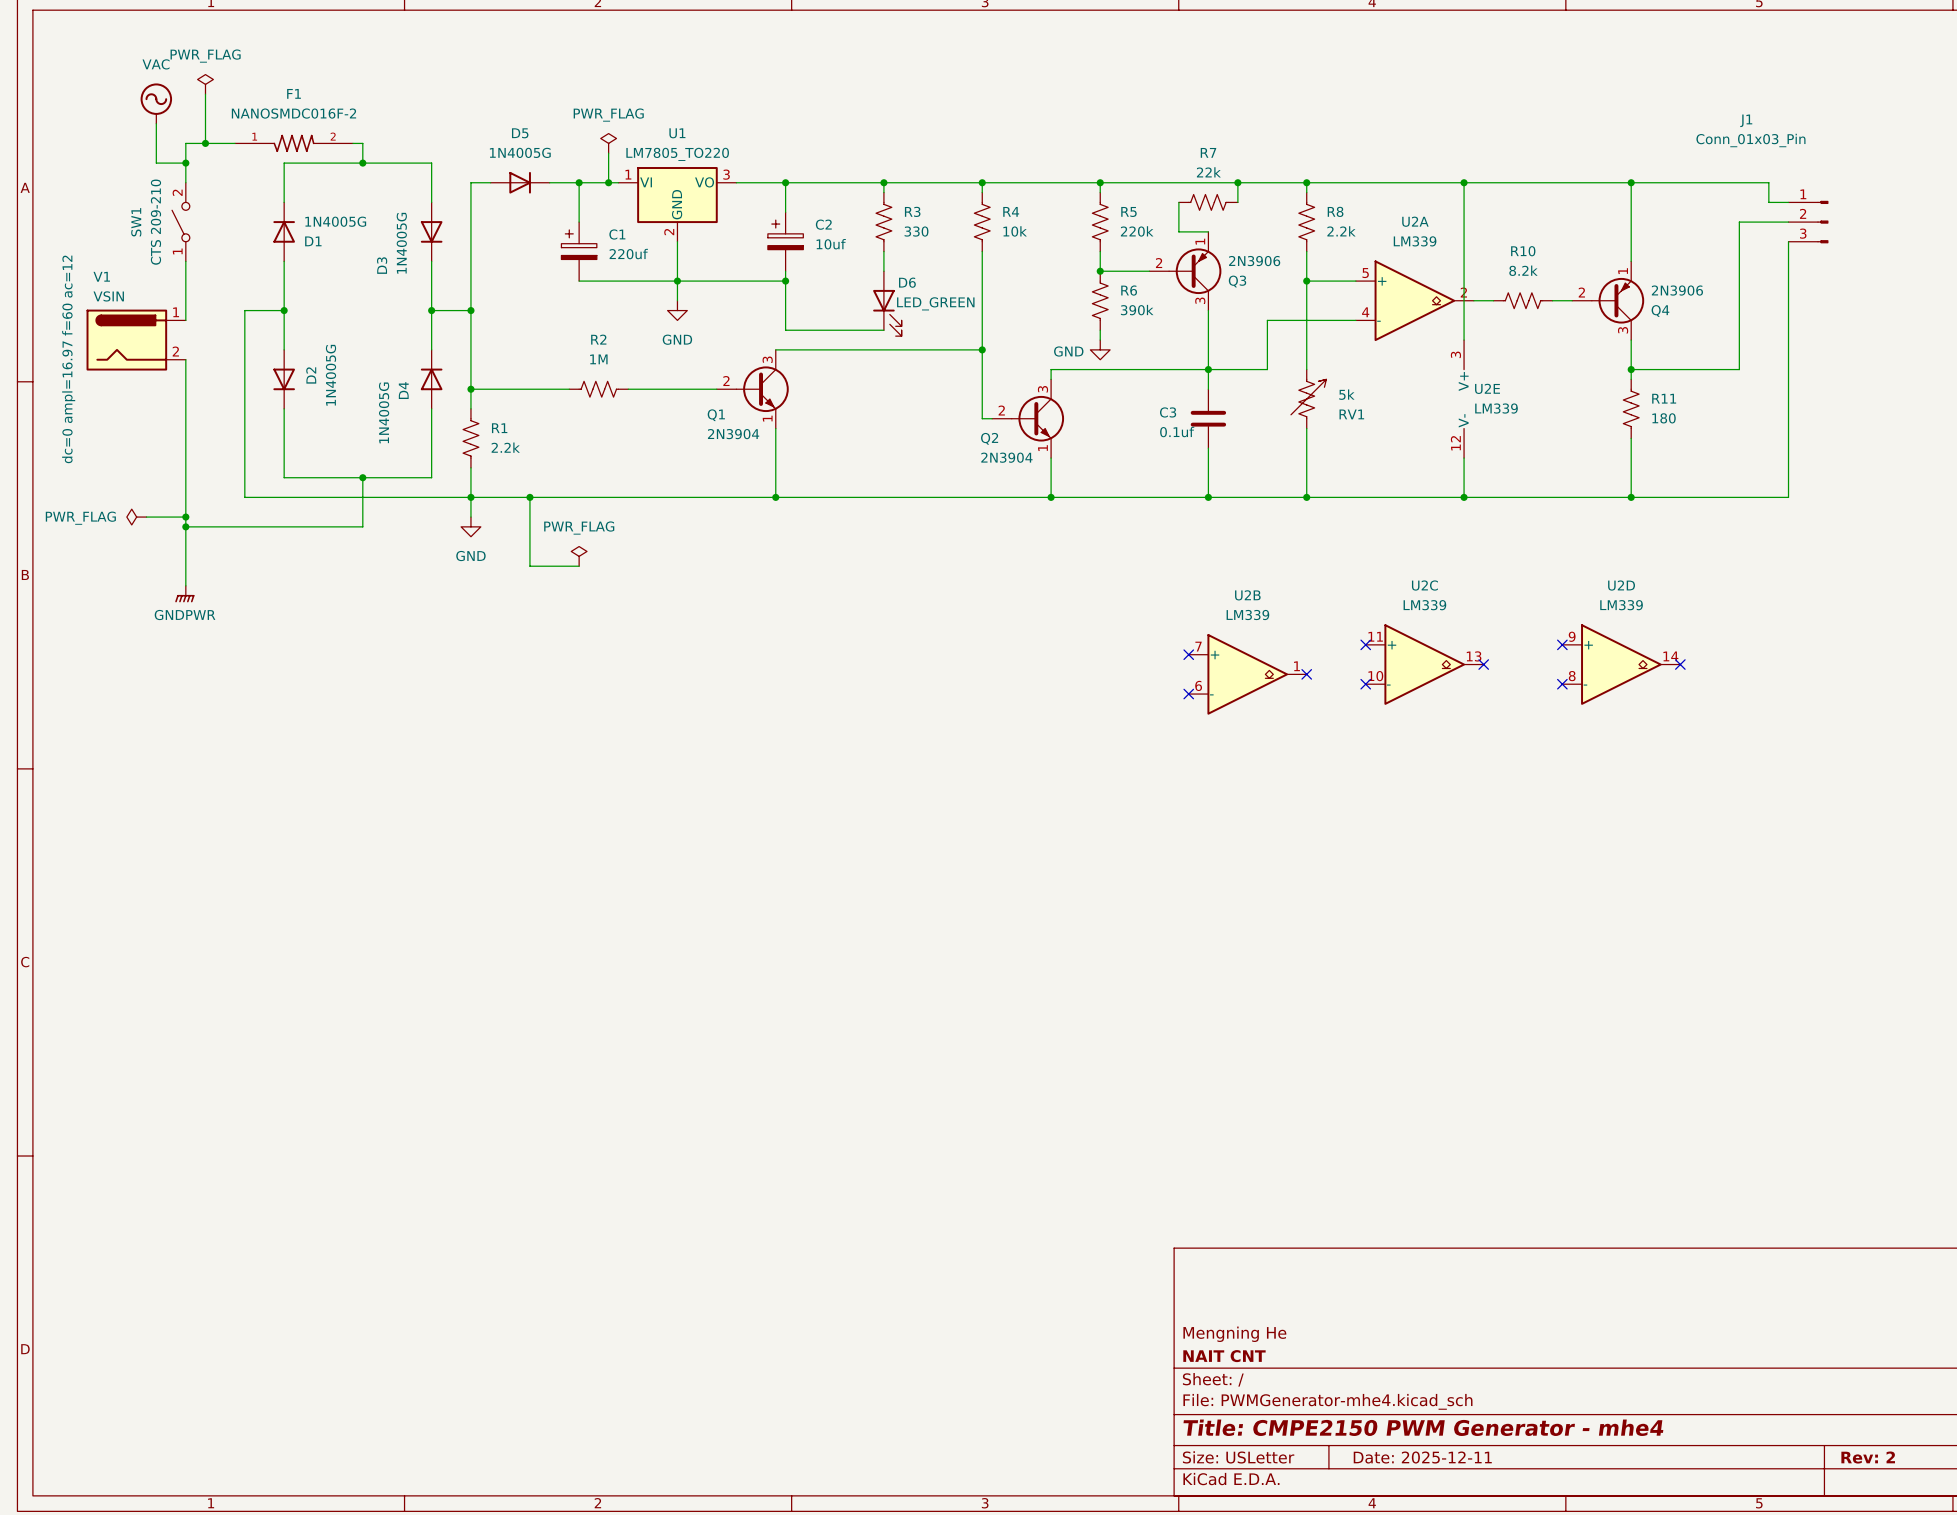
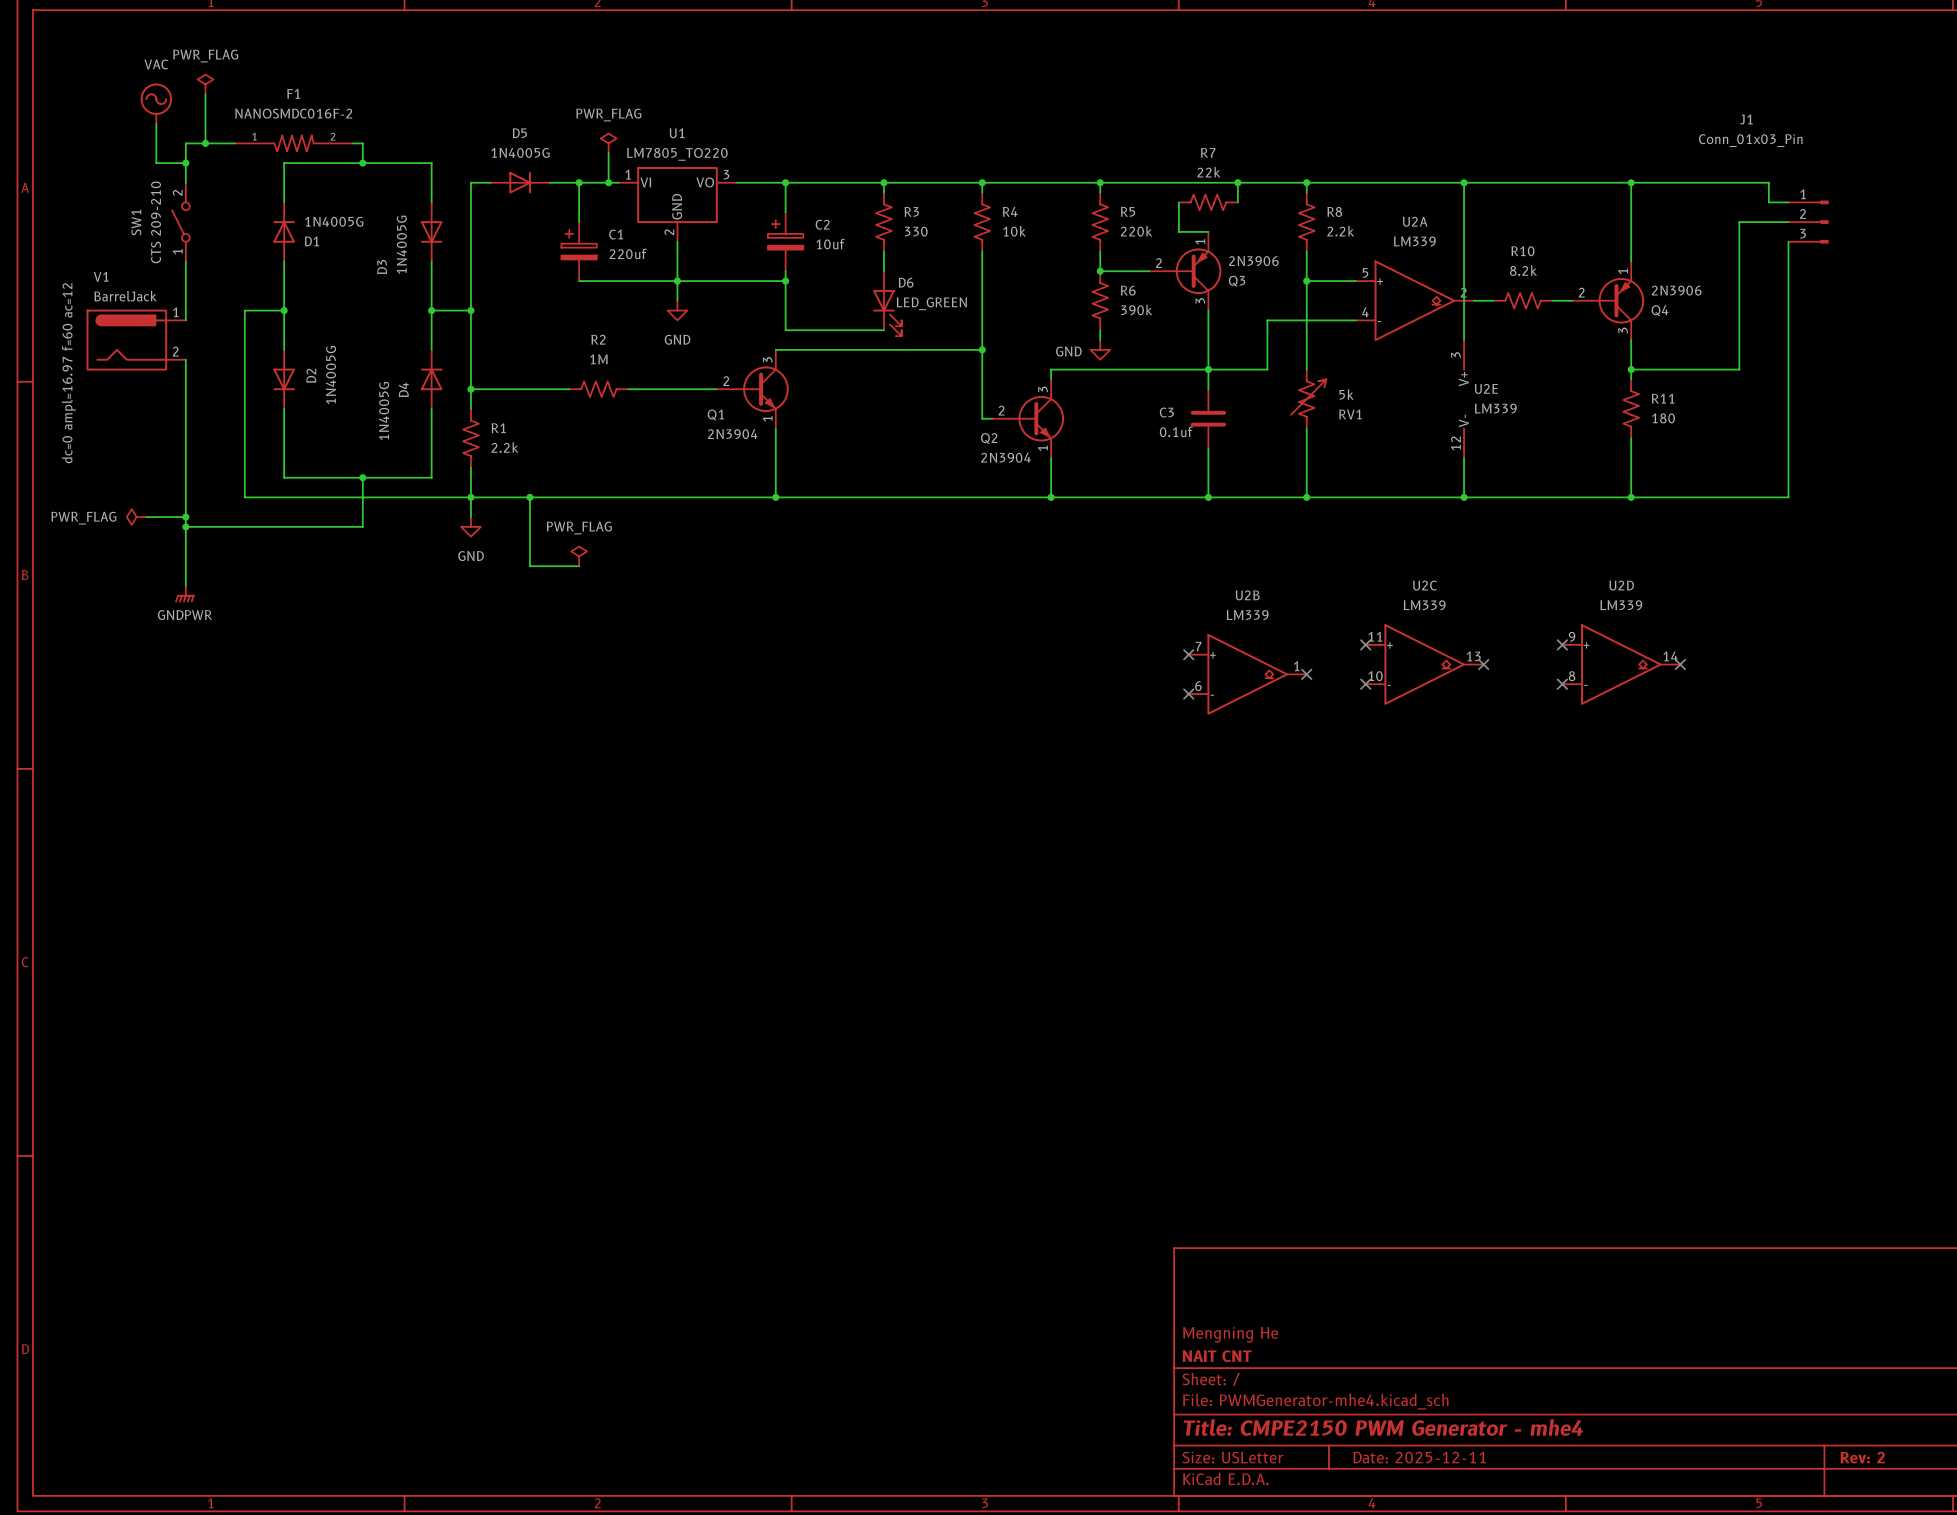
V1 value: VSIN (108, 296) -> BarrelJack (125, 296)

